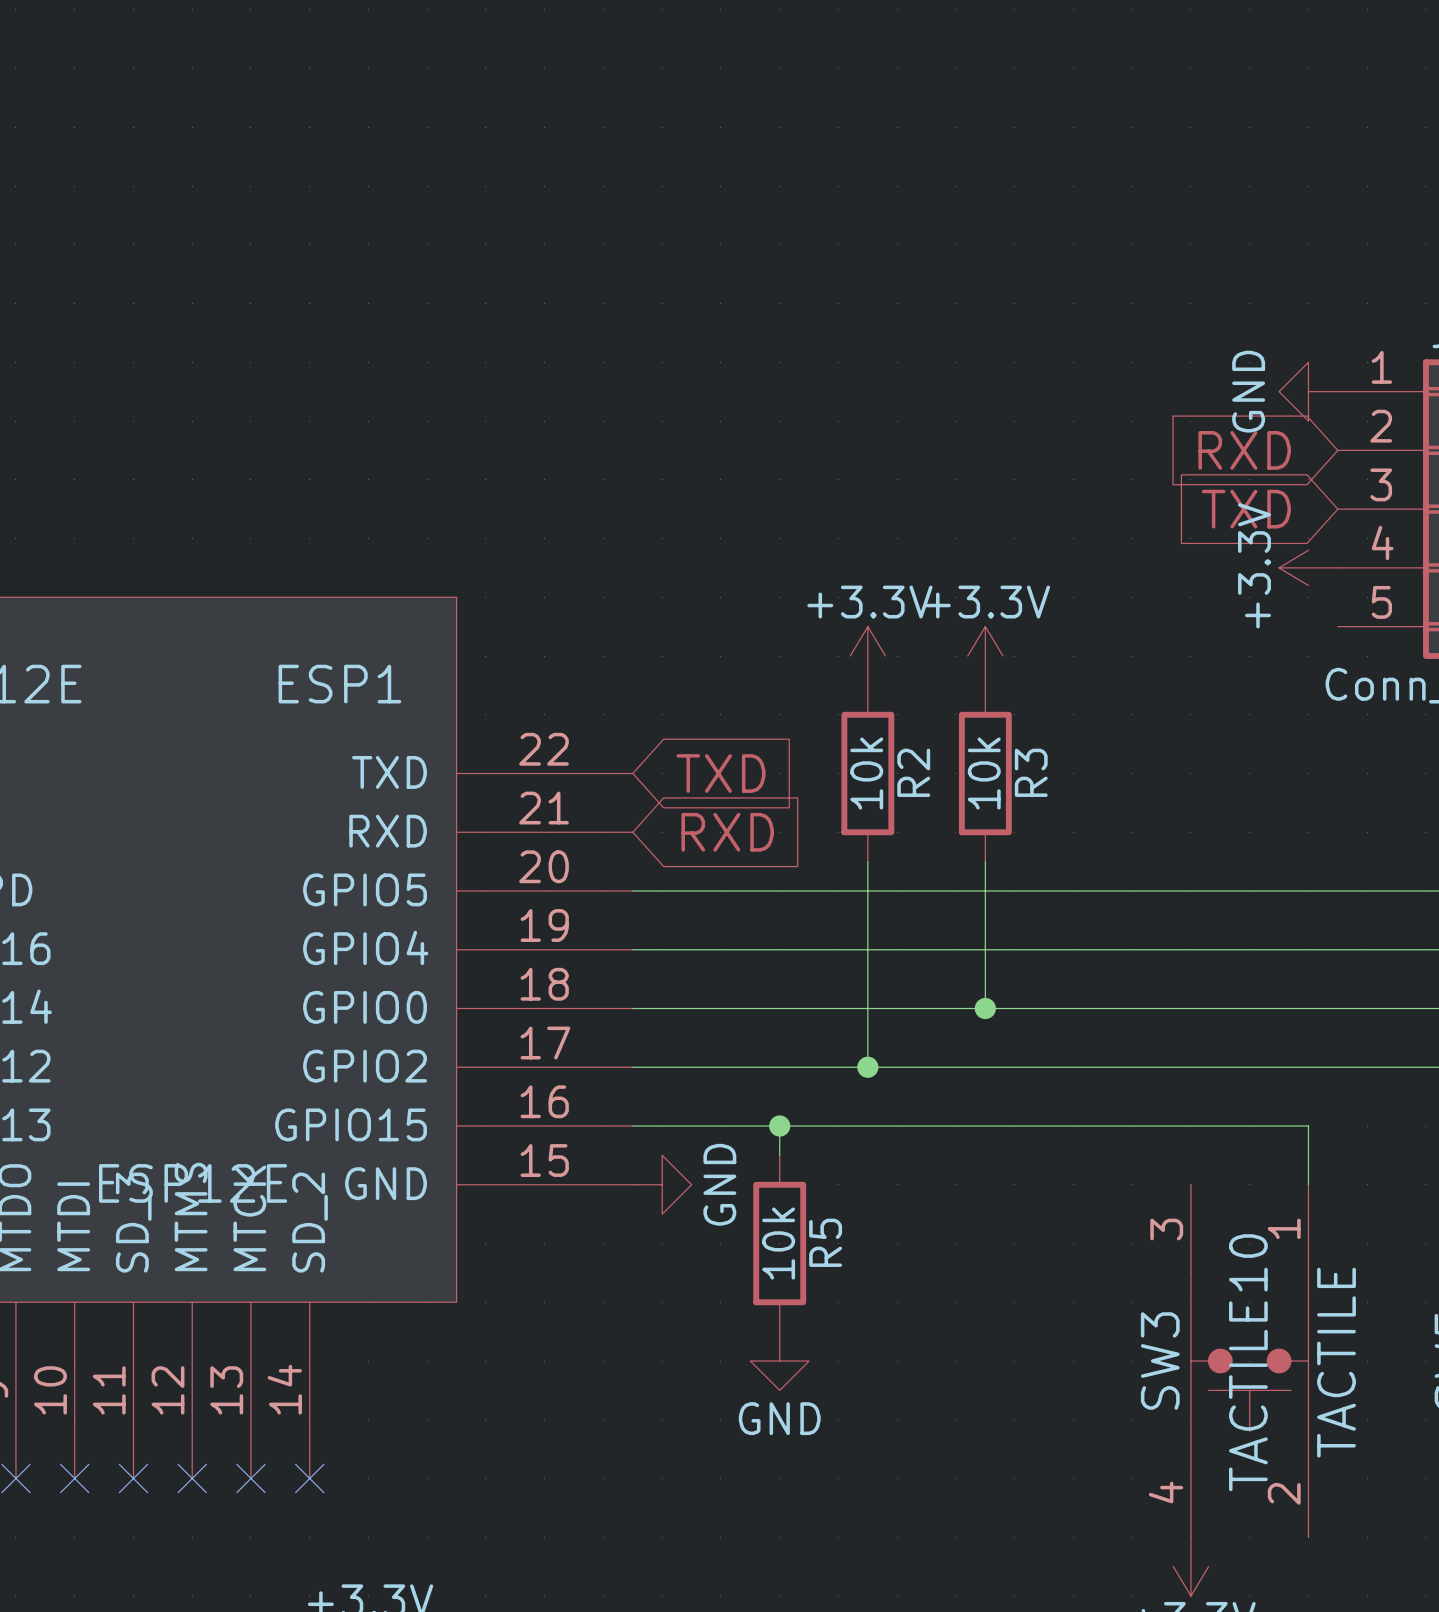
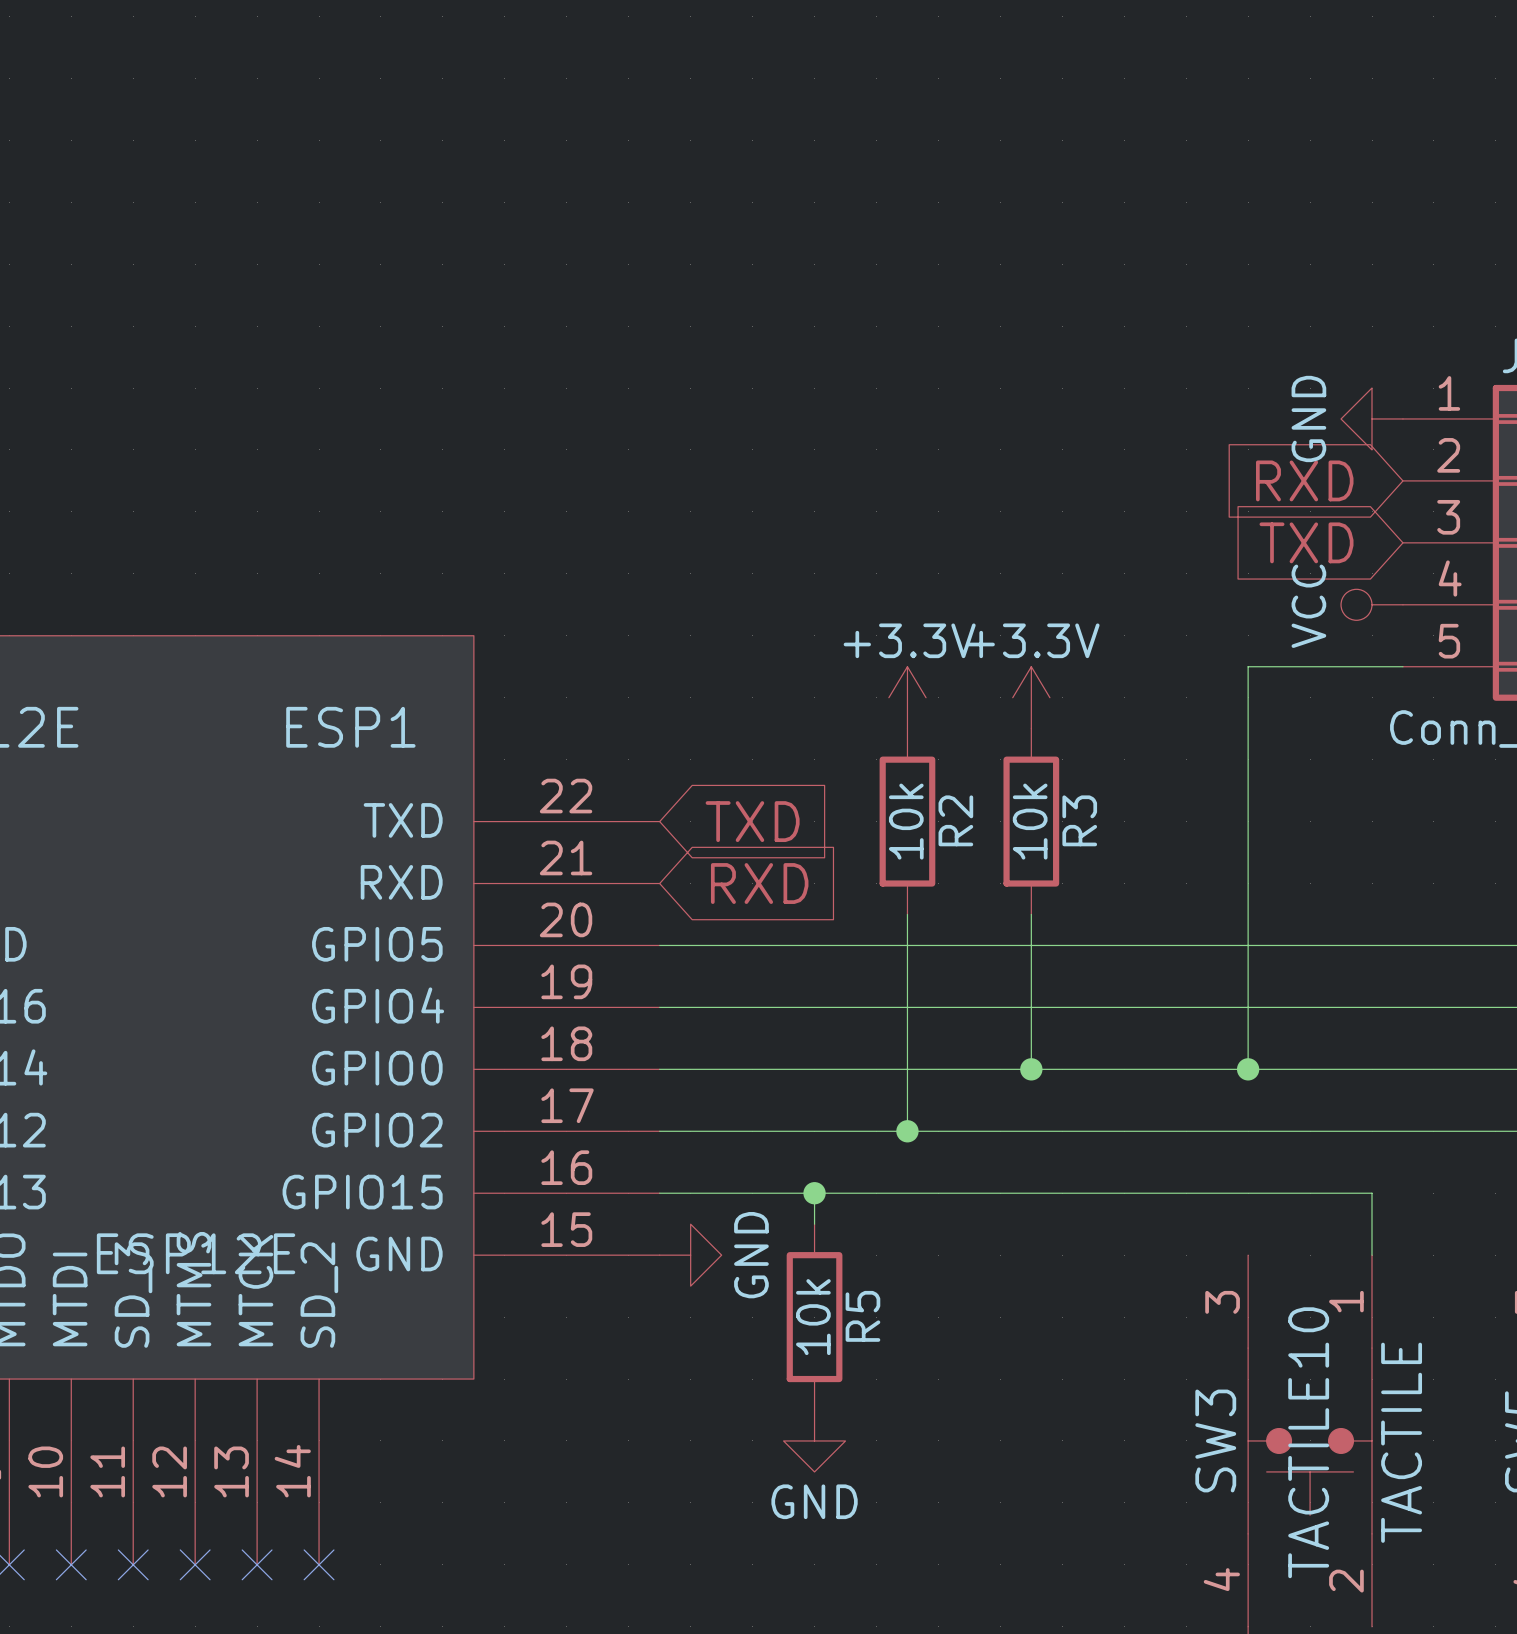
power symbol: +3.3V (1308, 567) -> VCC (1372, 604)
wire: none -> (1402, 666) (1248, 666) (1248, 1069)
junction: none -> (1248, 1069)

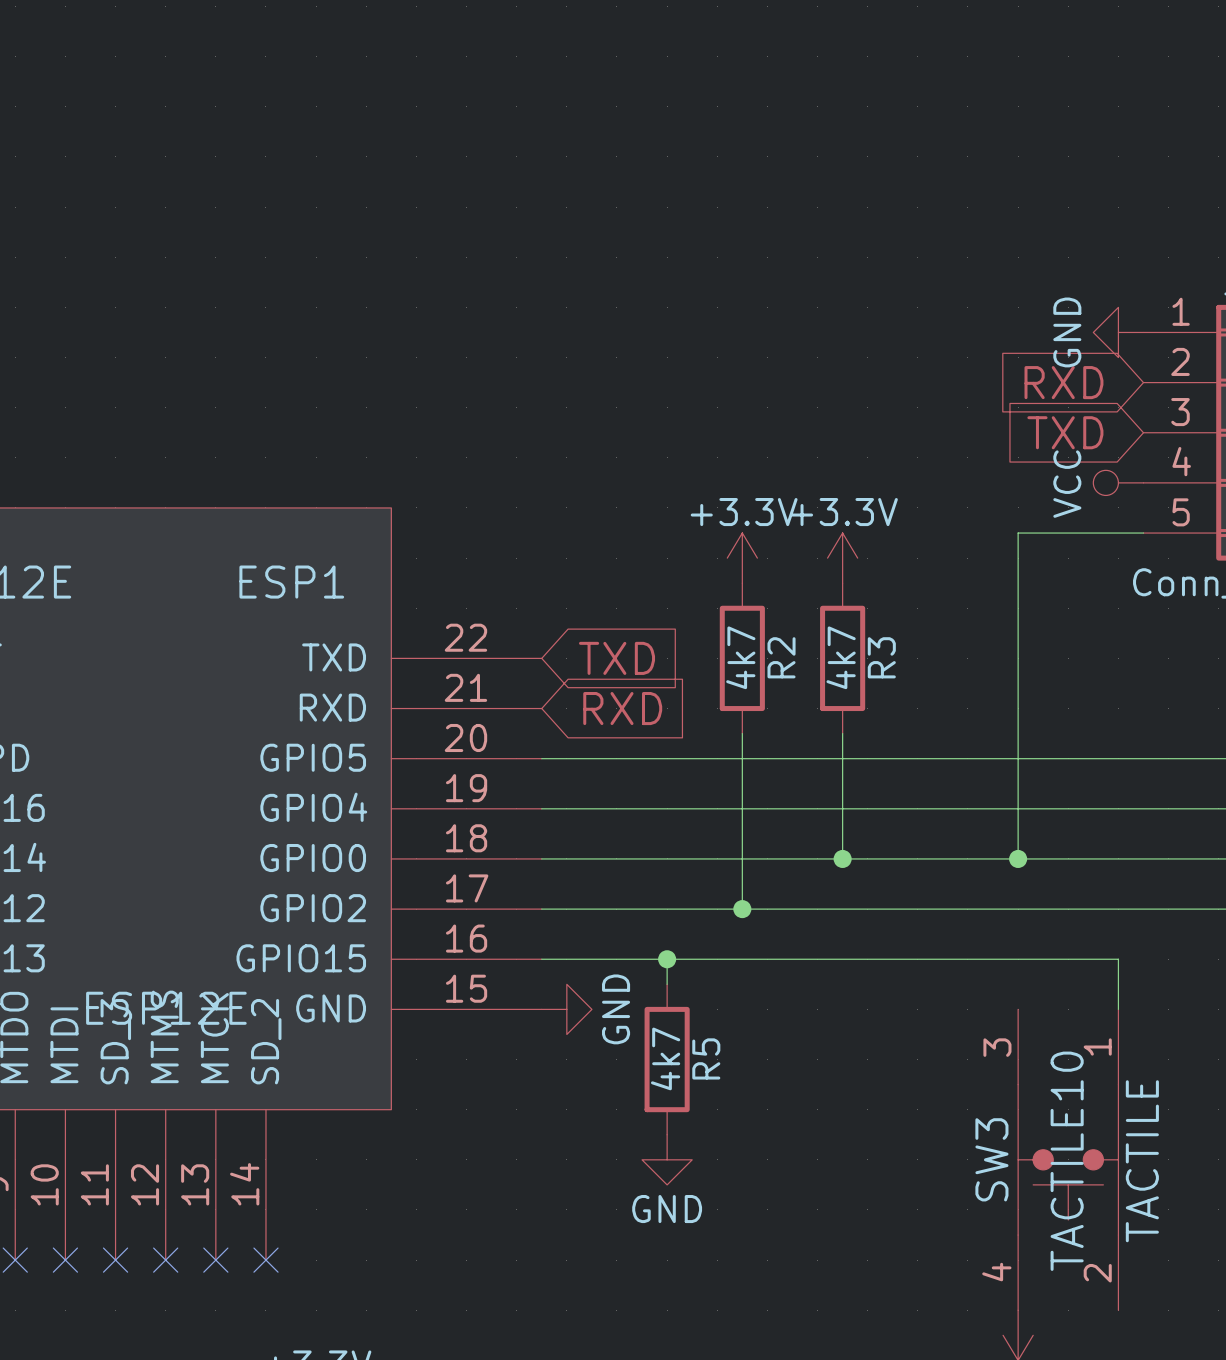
R2 value: 10k (906, 821) -> 4k7 (740, 657)
R3 value: 10k (1030, 821) -> 4k7 (841, 657)
R5 value: 10k (813, 1317) -> 4k7 (665, 1058)

